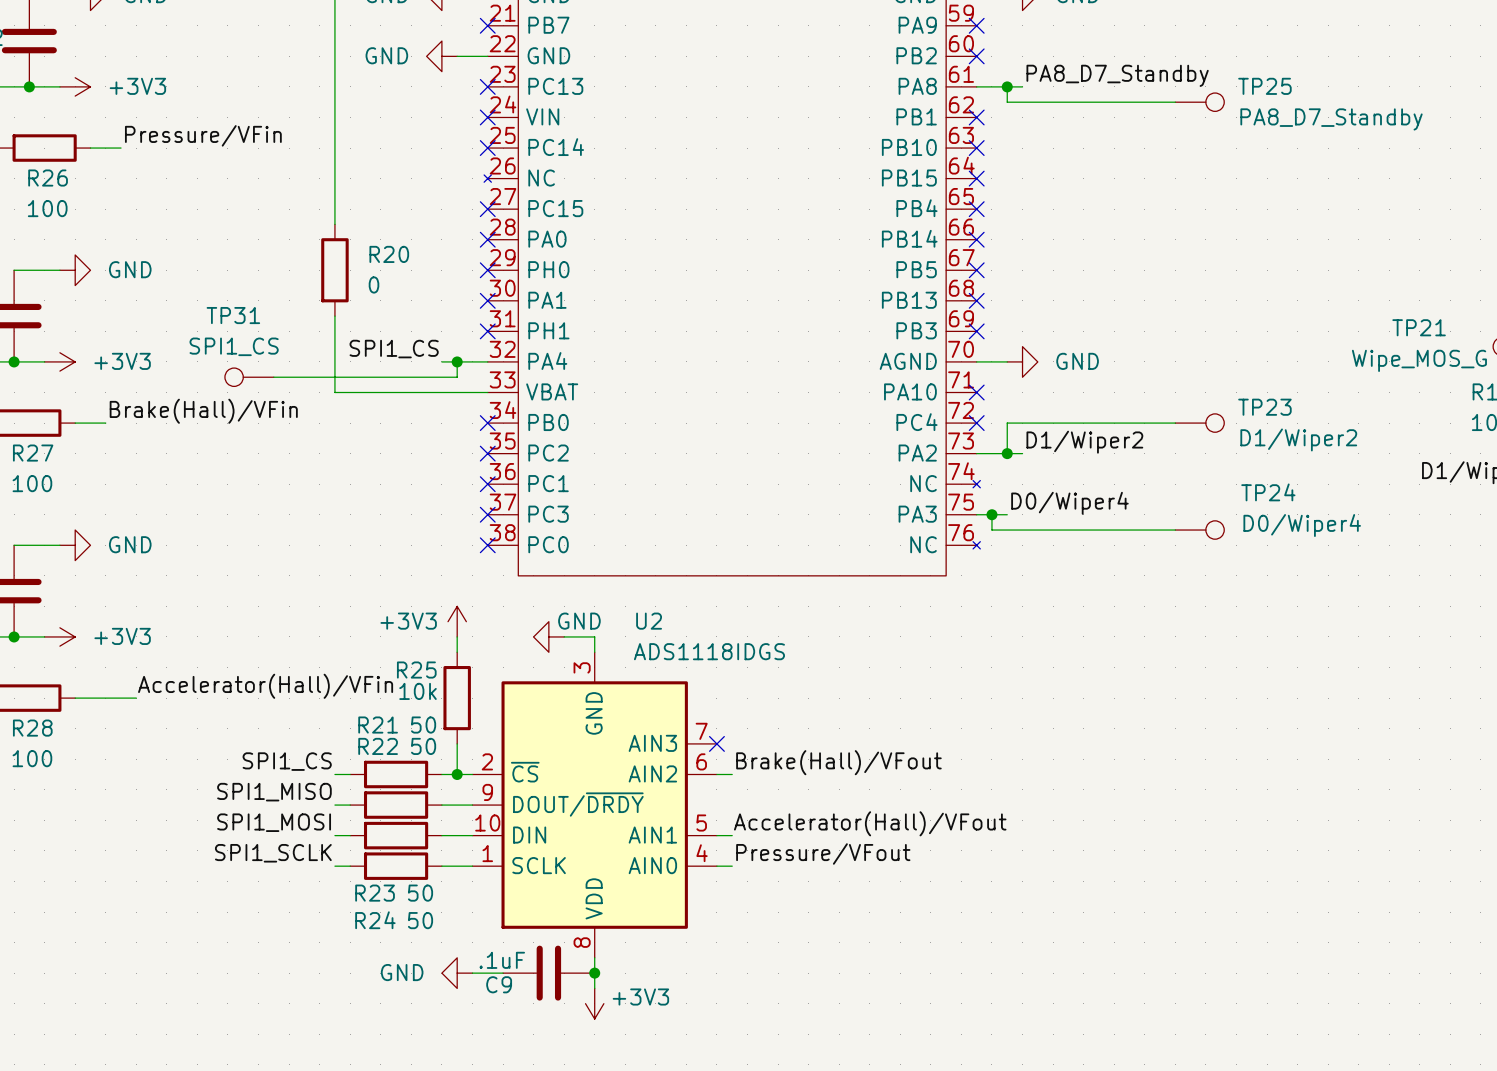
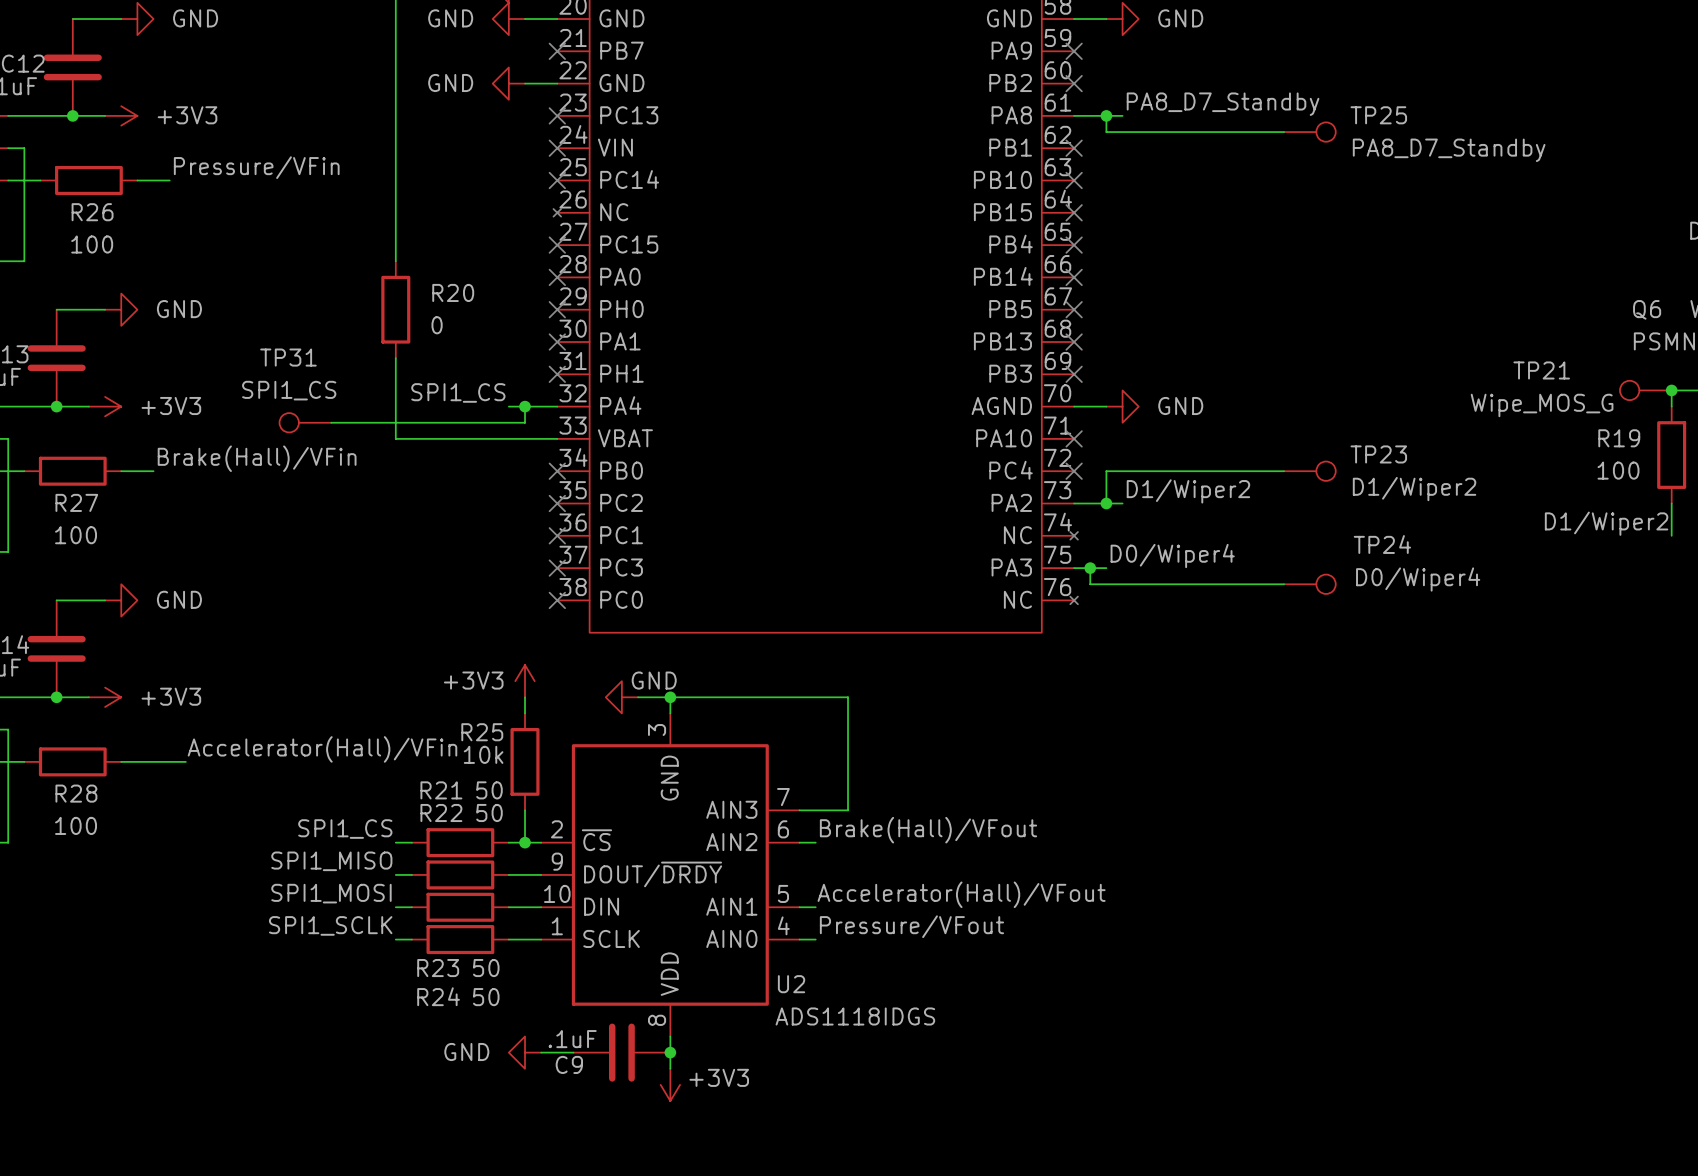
U2 name position: U2 (649, 621) -> U2 (791, 984)
wire: none -> (670, 697) (848, 697) (848, 810) (799, 810)
junction: none -> (670, 697)
U2 value position: ADS1118IDGS (709, 651) -> ADS1118IDGS (855, 1016)
no-connect mark: (716, 743) -> none

